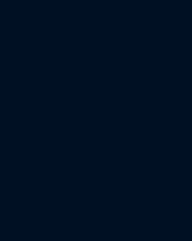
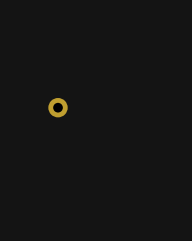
via: none -> (58, 107)

